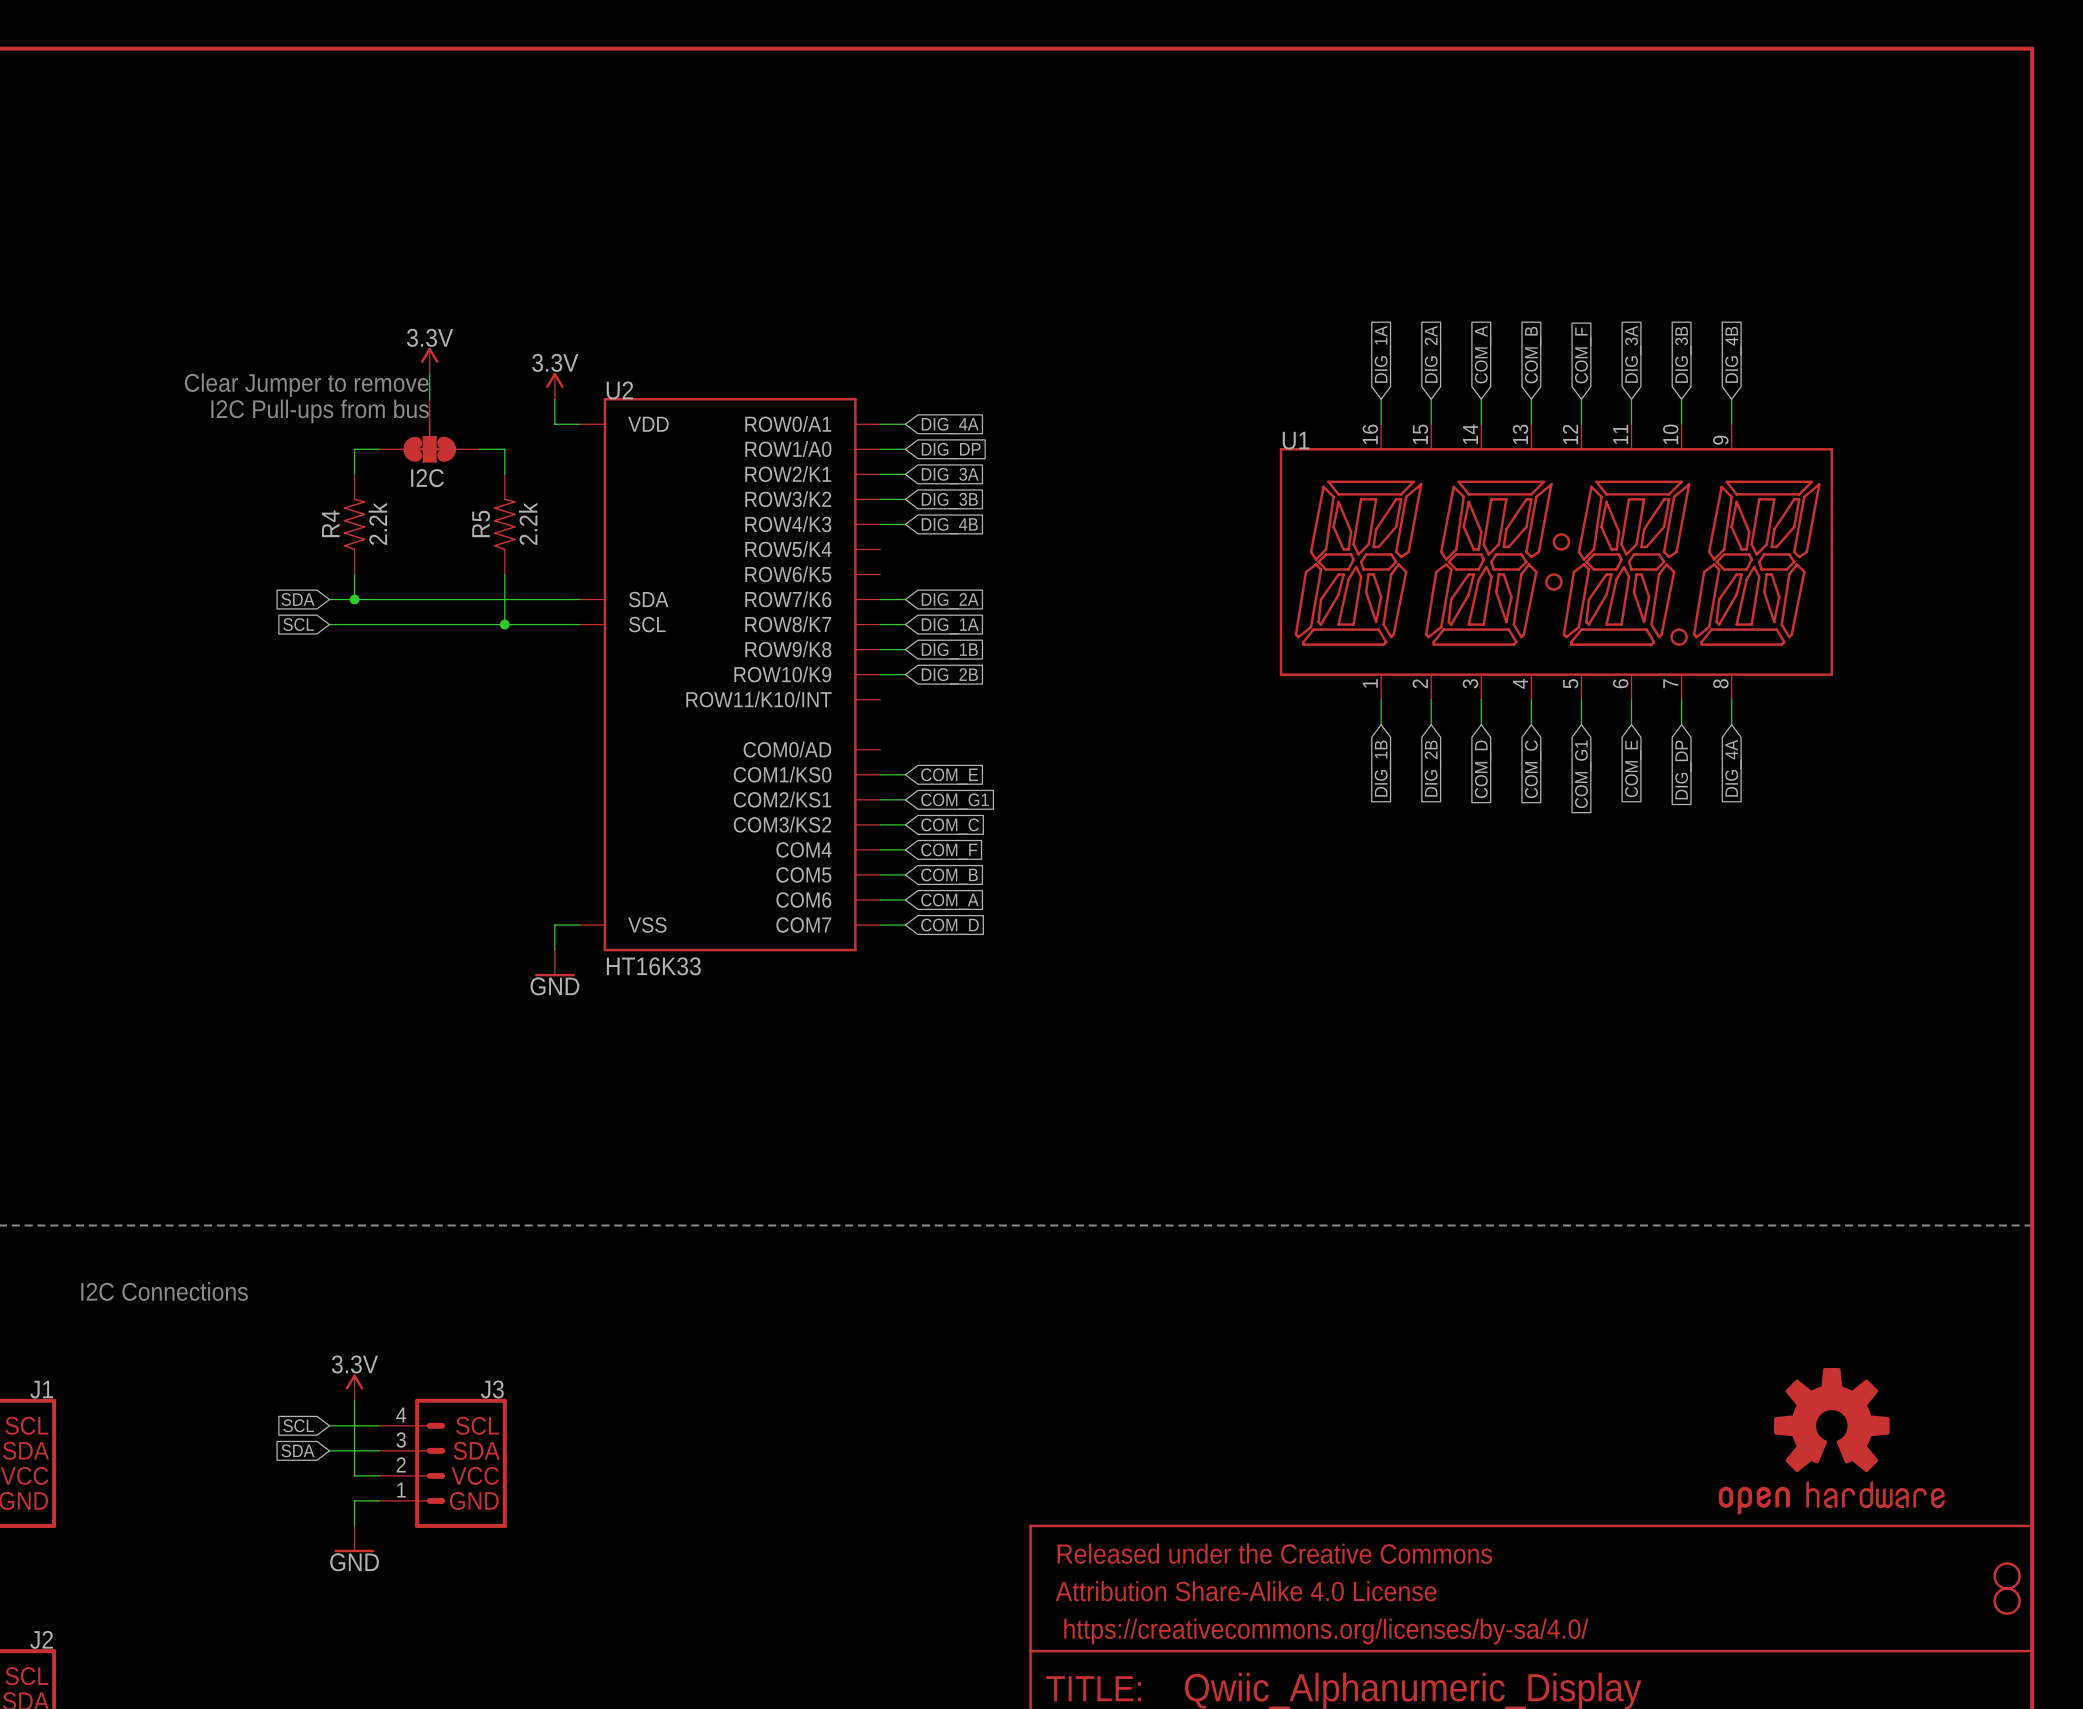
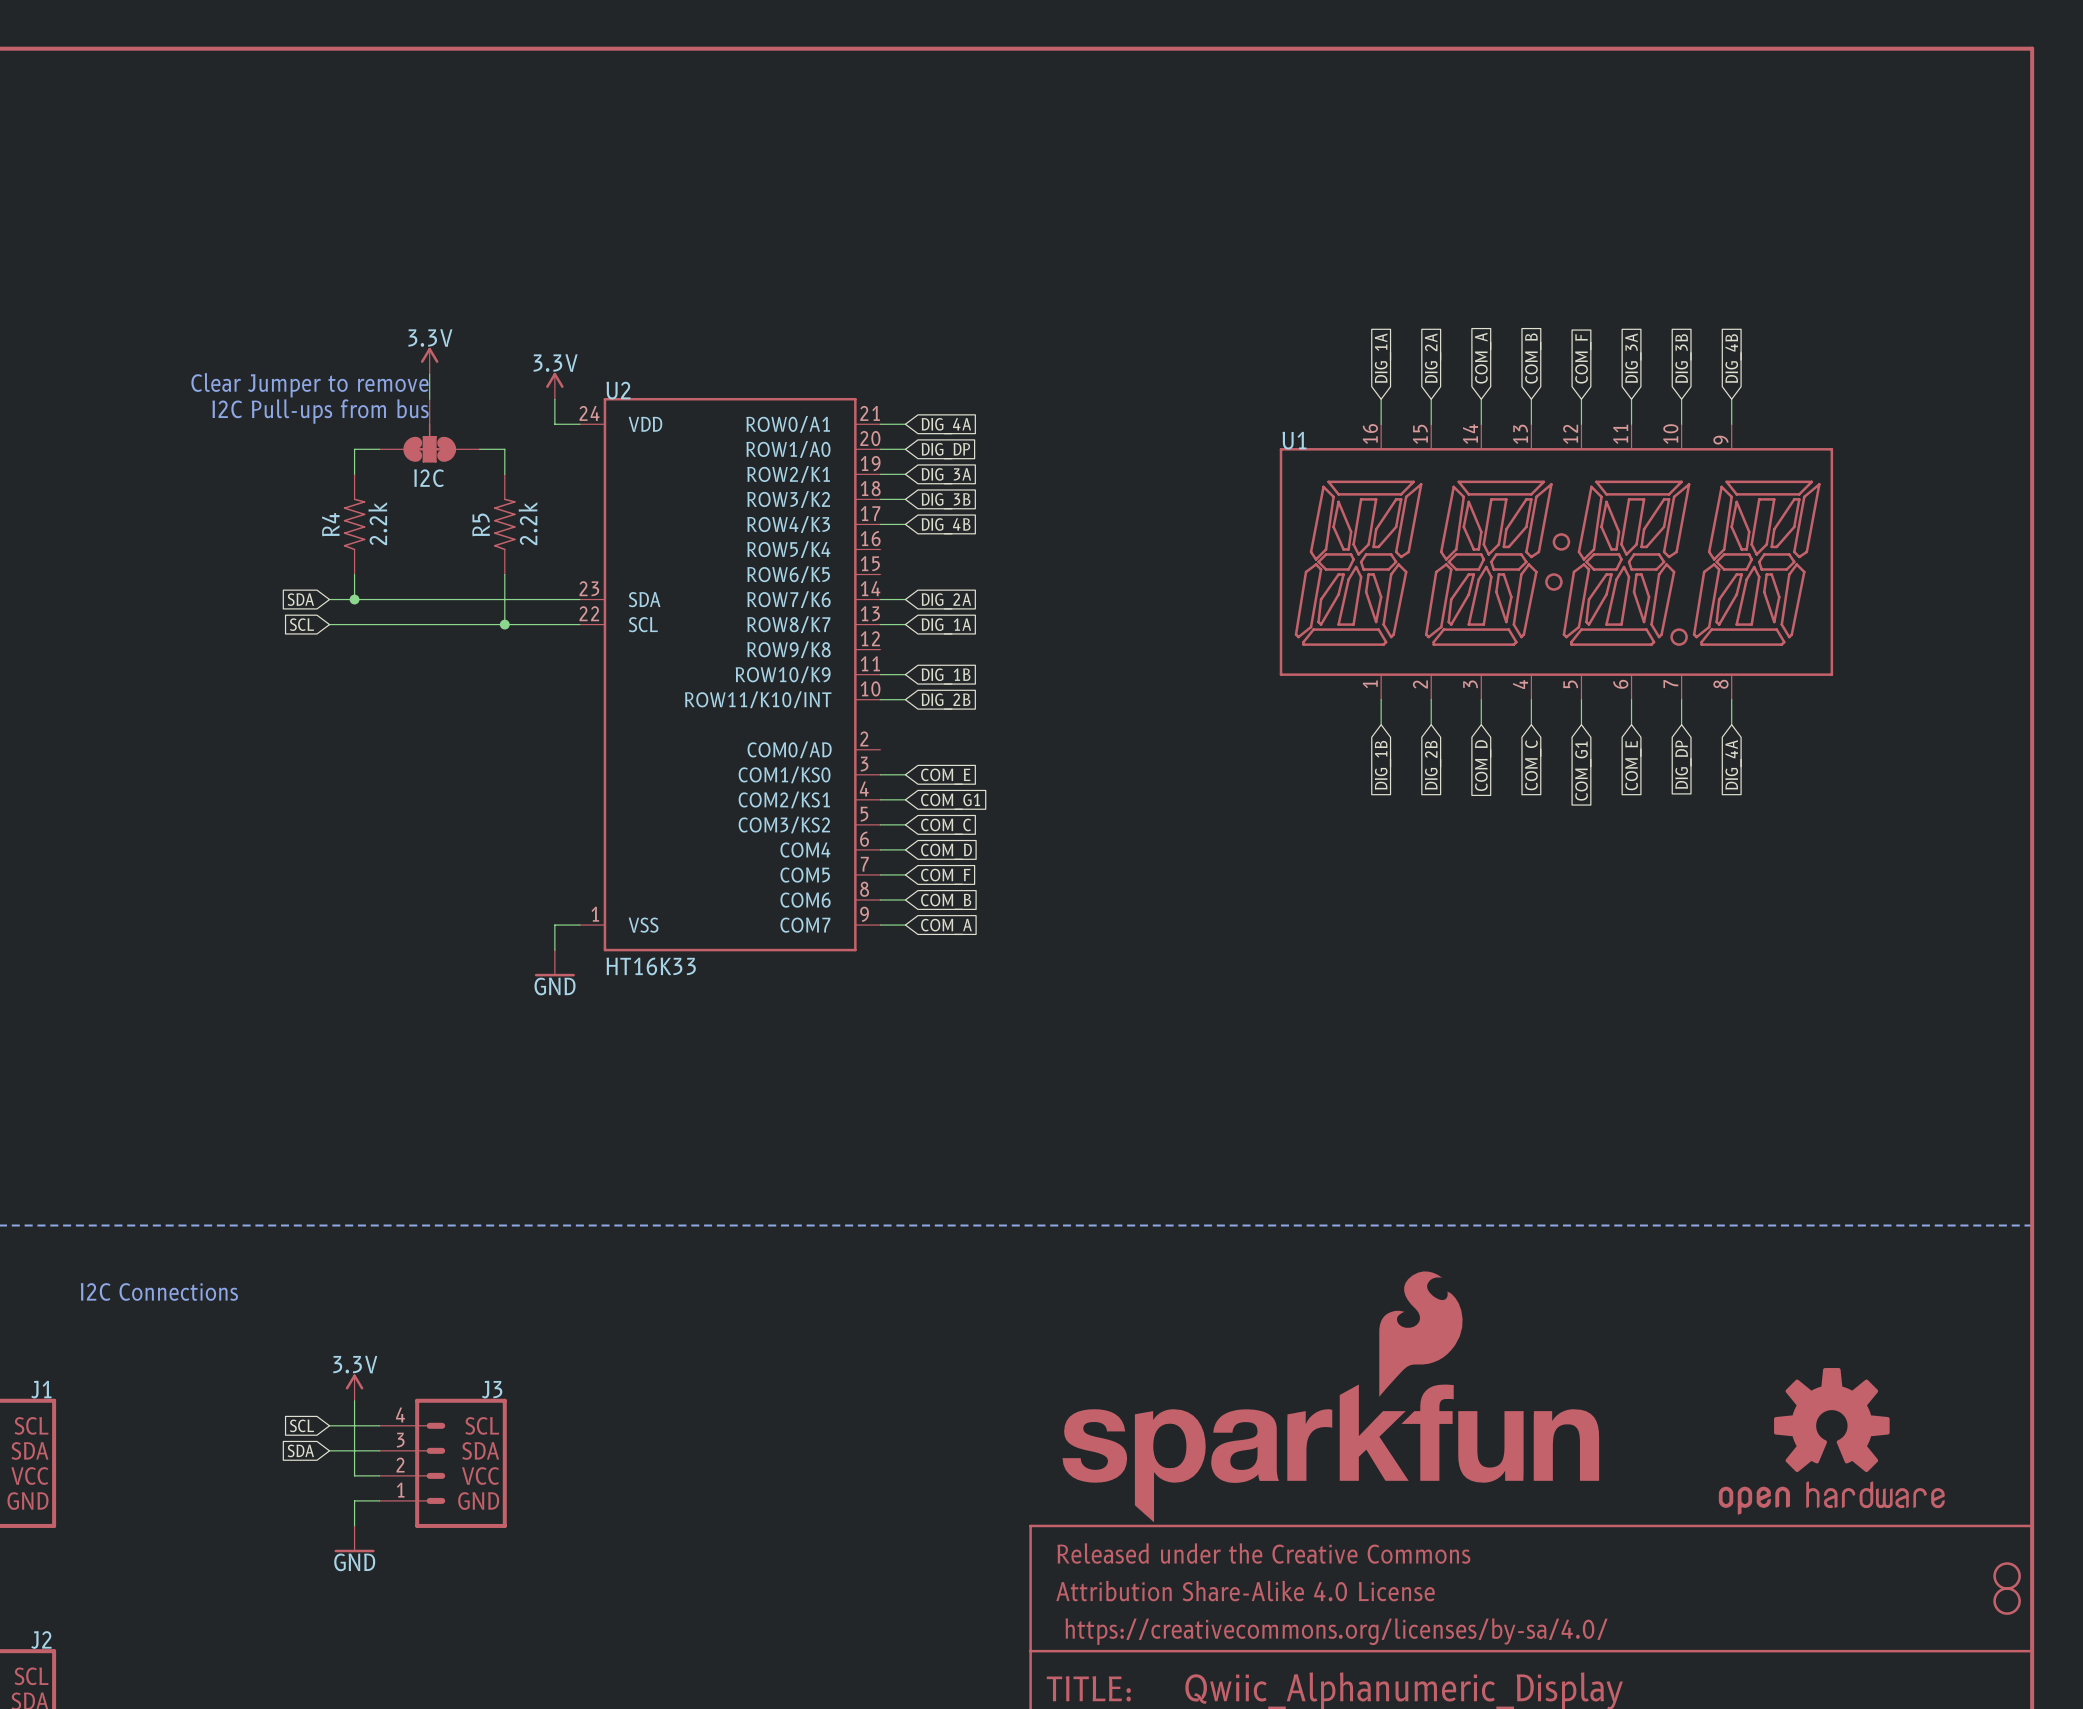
U2 symbol: [579, 397, 881, 952] -> [579, 397, 881, 952]
wire: (880, 649) (905, 649) -> (880, 699) (905, 699)
global label: DIG_1B (949, 651) -> none
global label: DIG_2B (949, 676) -> DIG_1B (946, 676)
global label: none -> DIG_2B (946, 701)
global label: COM_F (949, 851) -> COM_D (946, 851)
global label: COM_B (949, 876) -> COM_F (945, 876)
global label: COM_A (949, 901) -> COM_B (946, 901)
global label: COM_D (950, 926) -> COM_A (946, 926)
part: none -> (1330, 1396)

